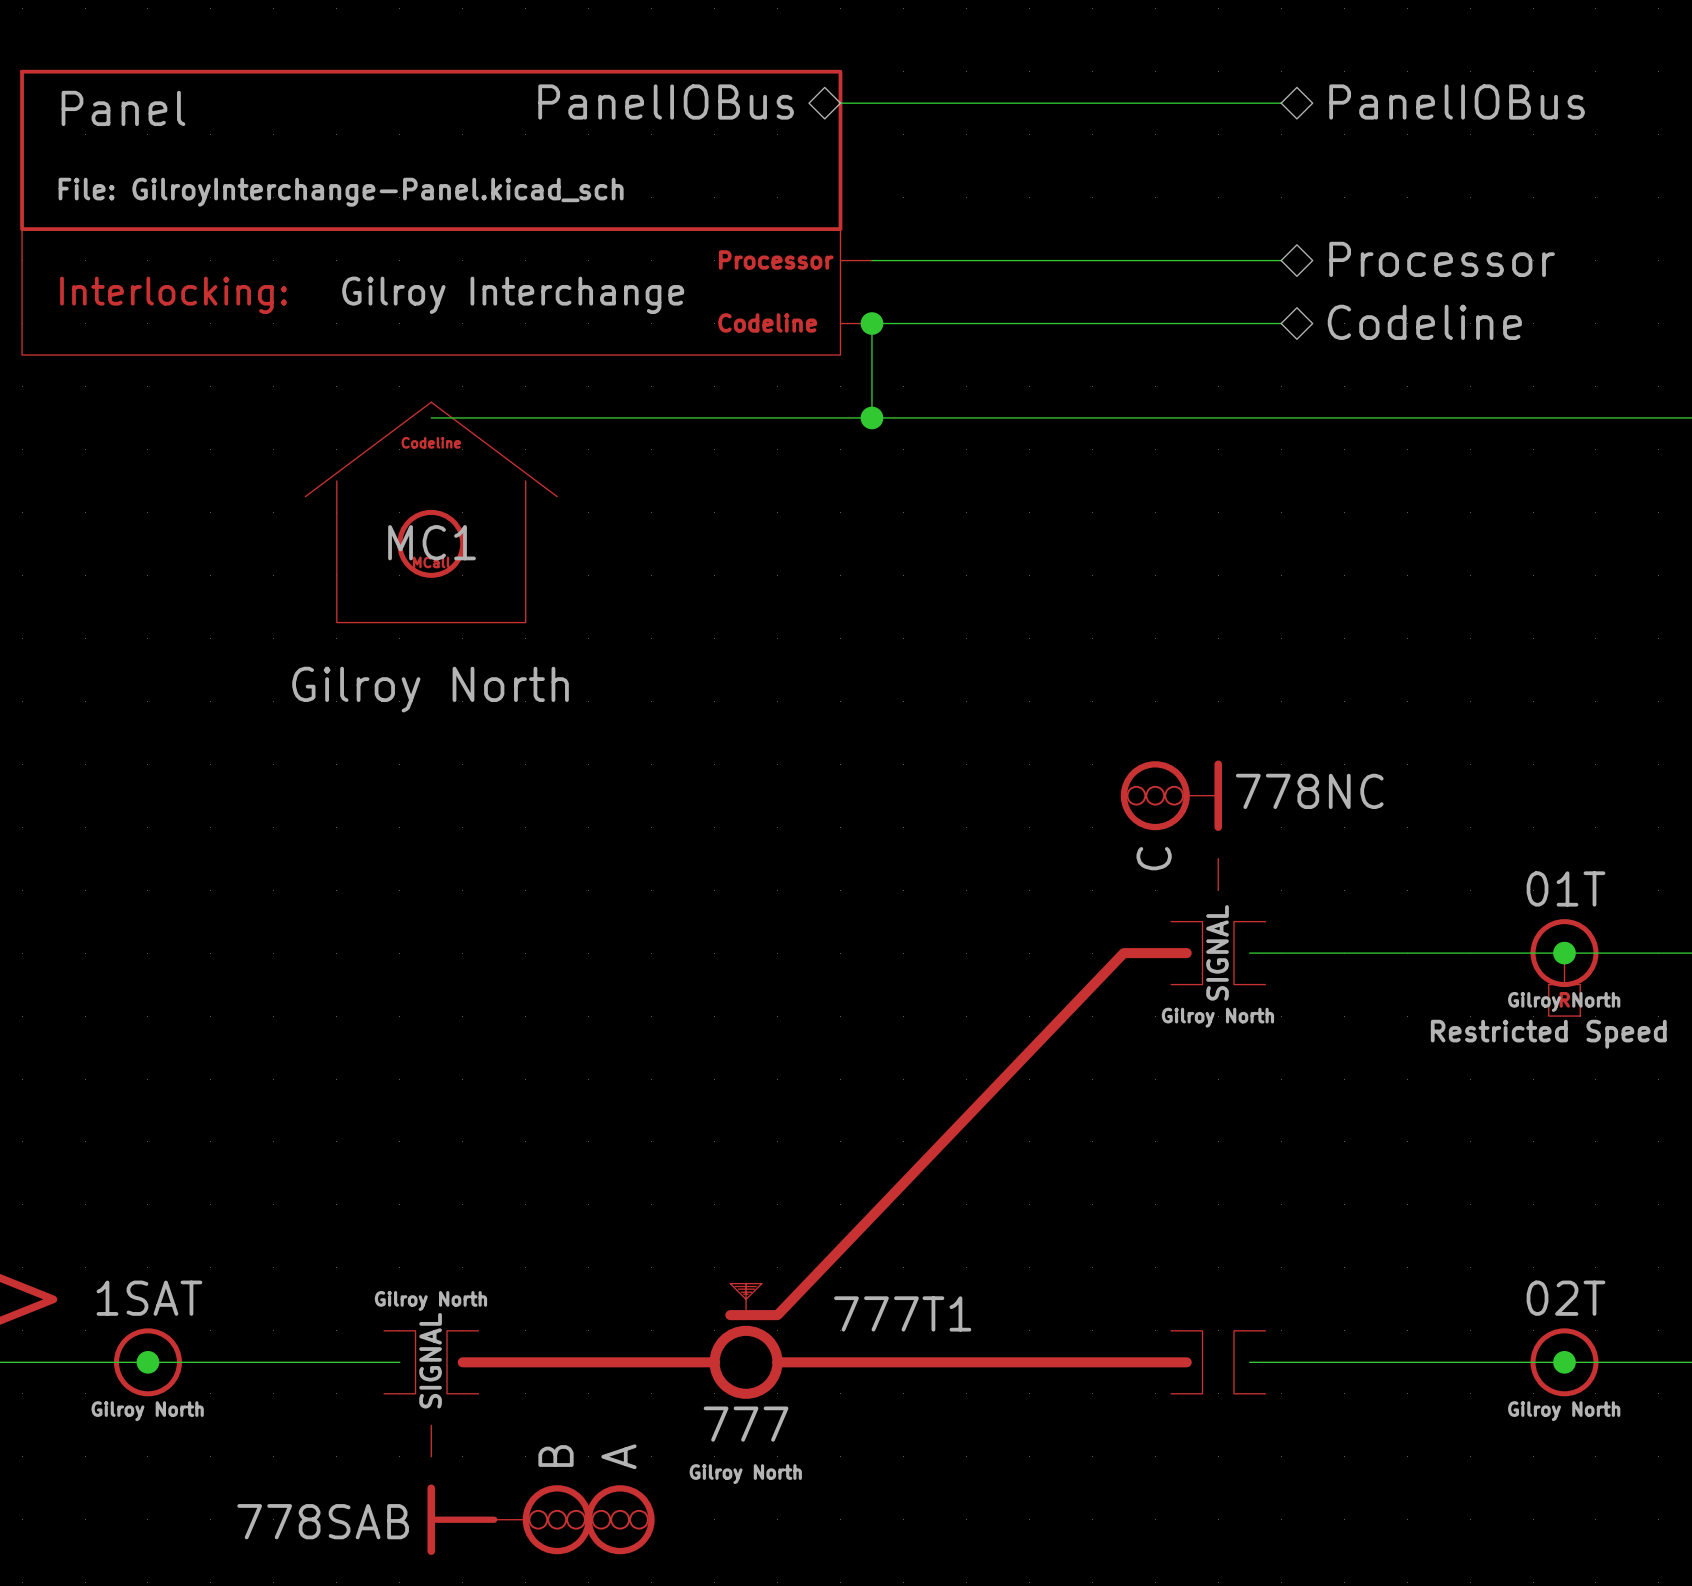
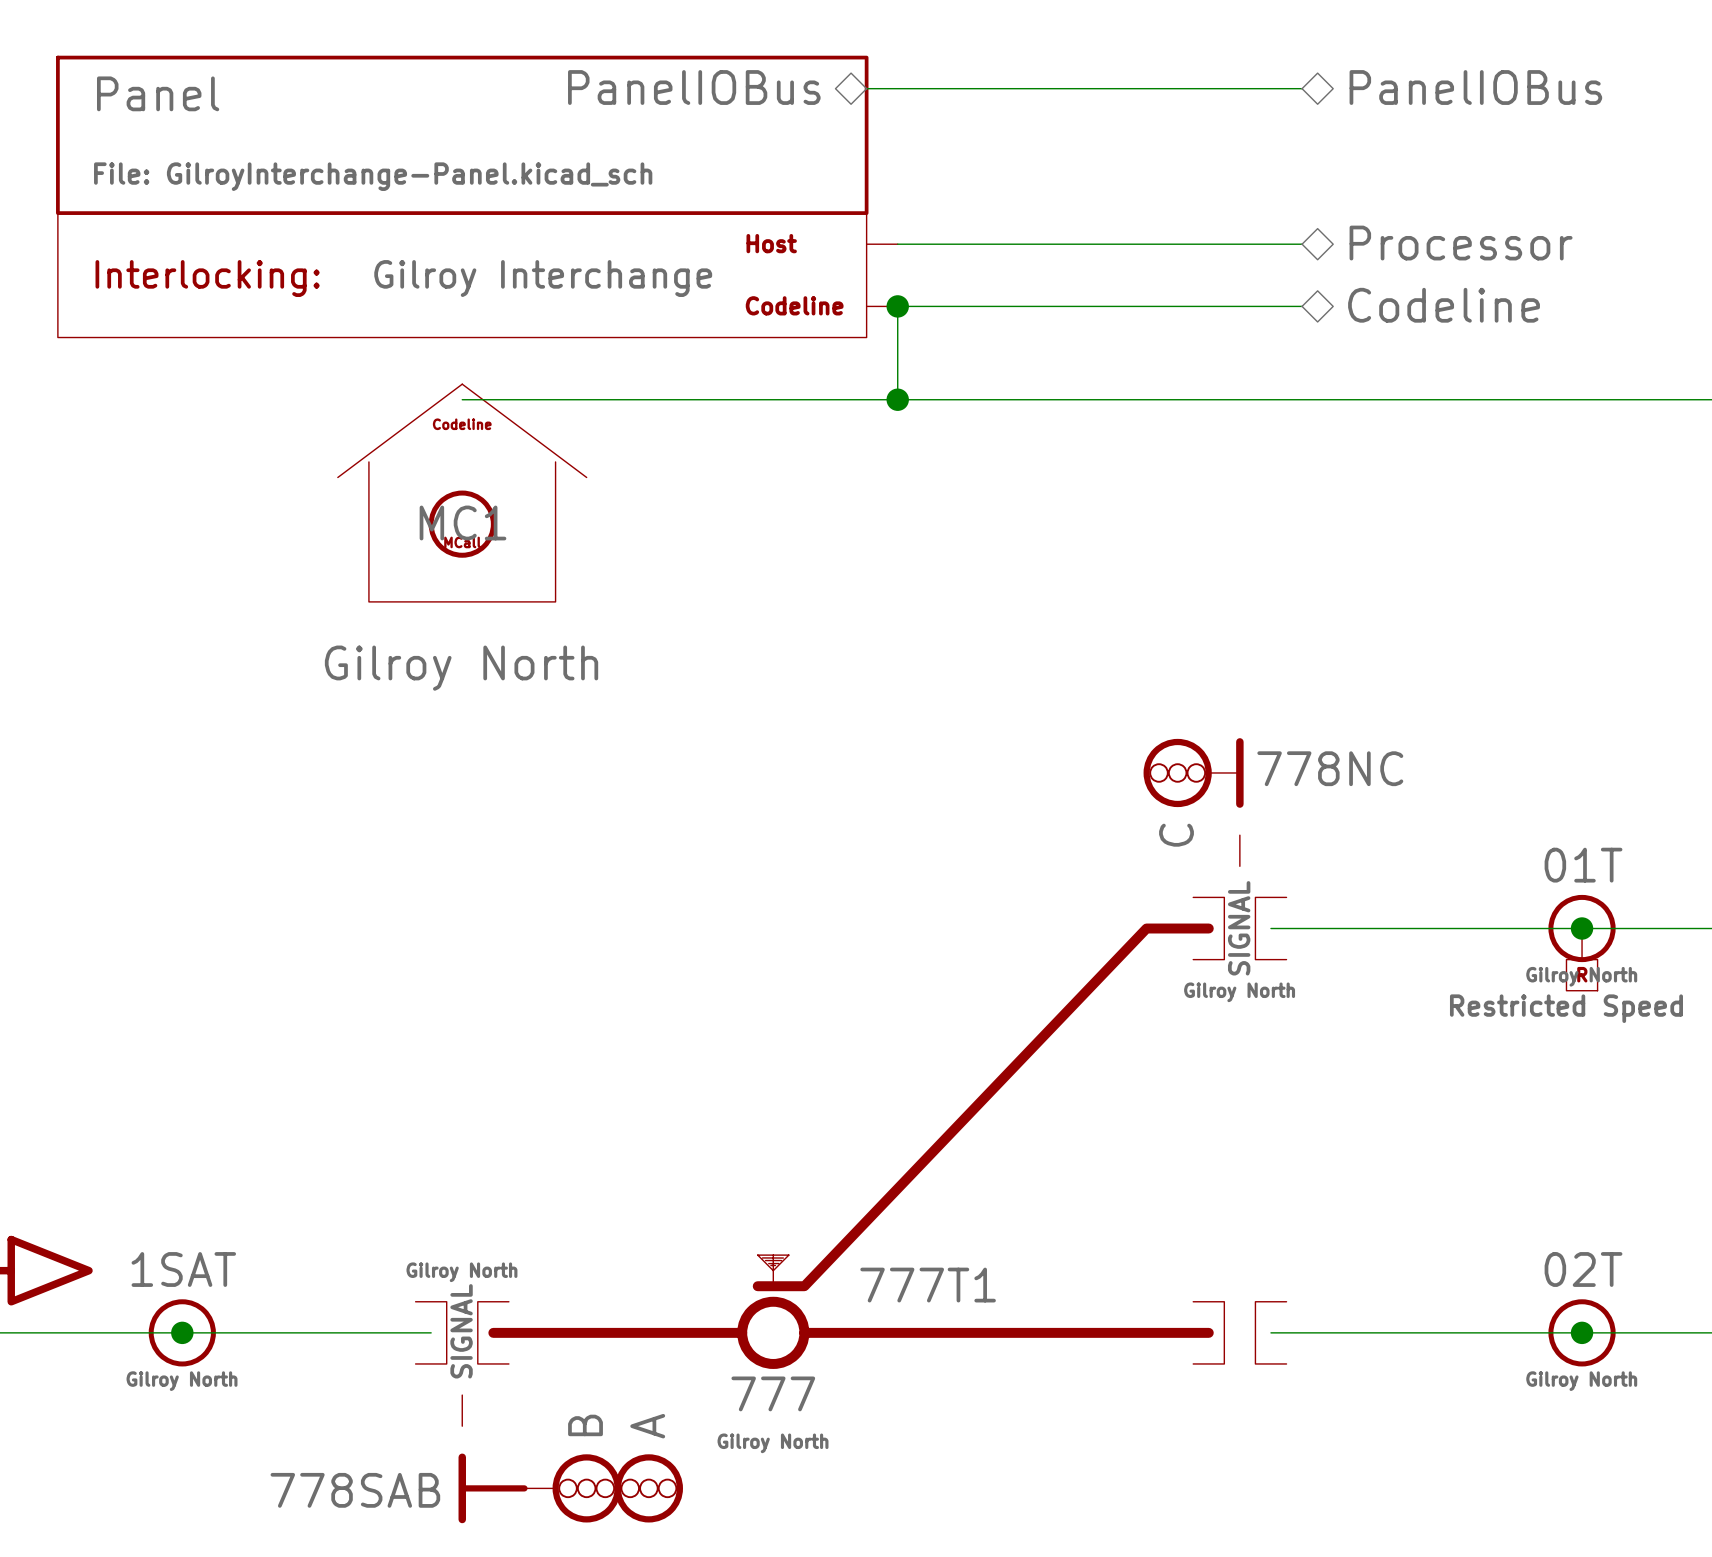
part text: Processor (776, 259) -> Host (771, 243)

